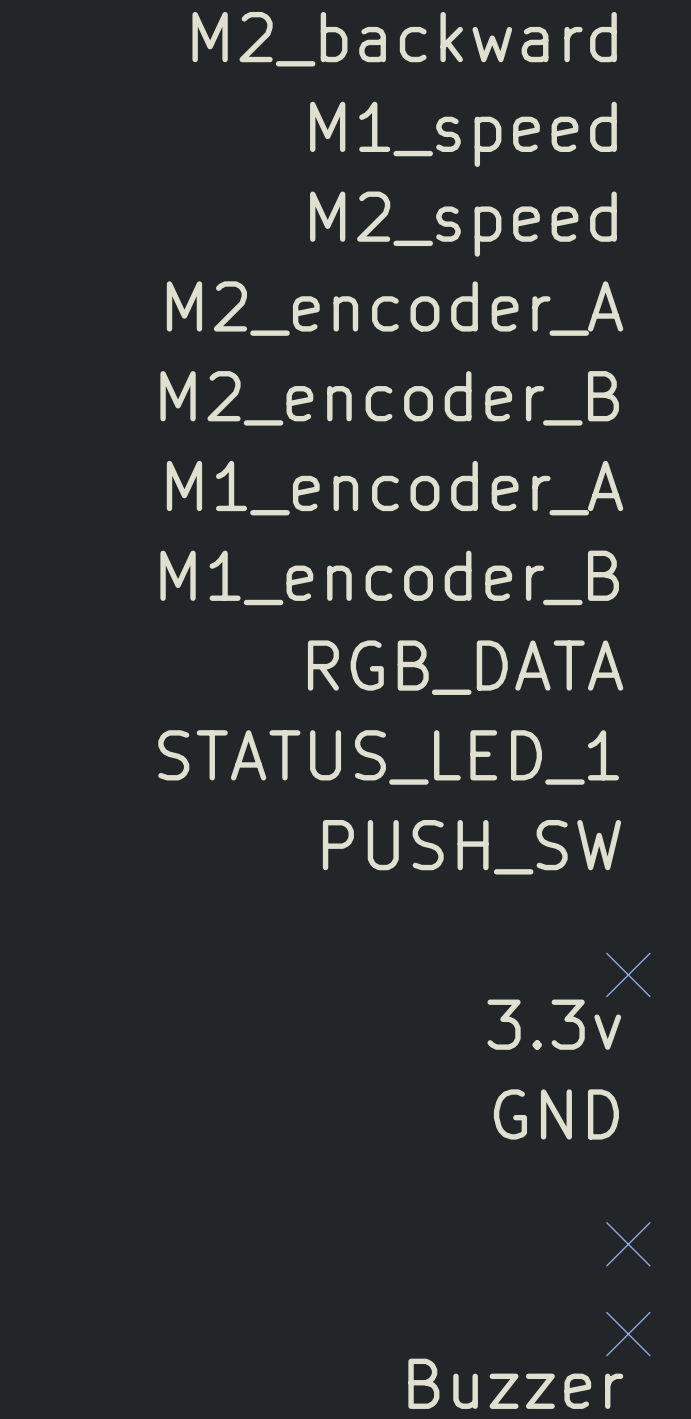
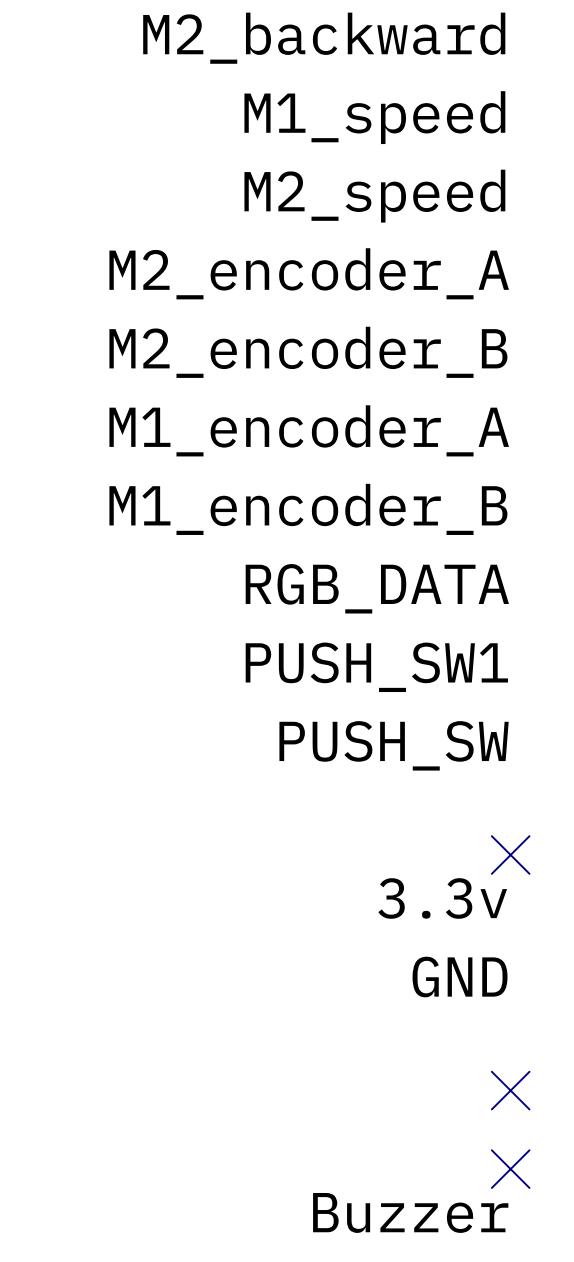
label: STATUS_LED_1 (388, 757) -> PUSH_SW1 (376, 667)

